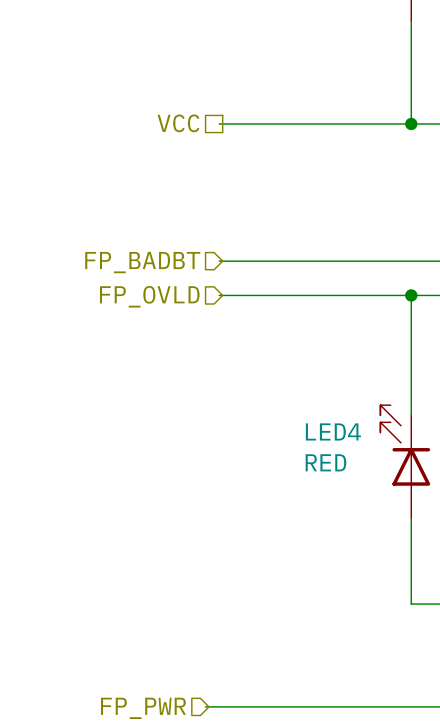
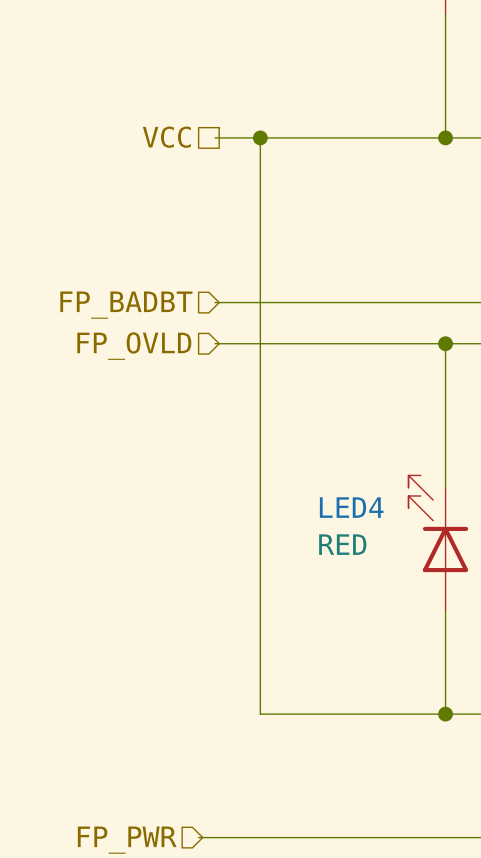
wire: none -> (260, 137) (260, 714) (445, 714)
junction: none -> (260, 137)
junction: none -> (445, 714)

